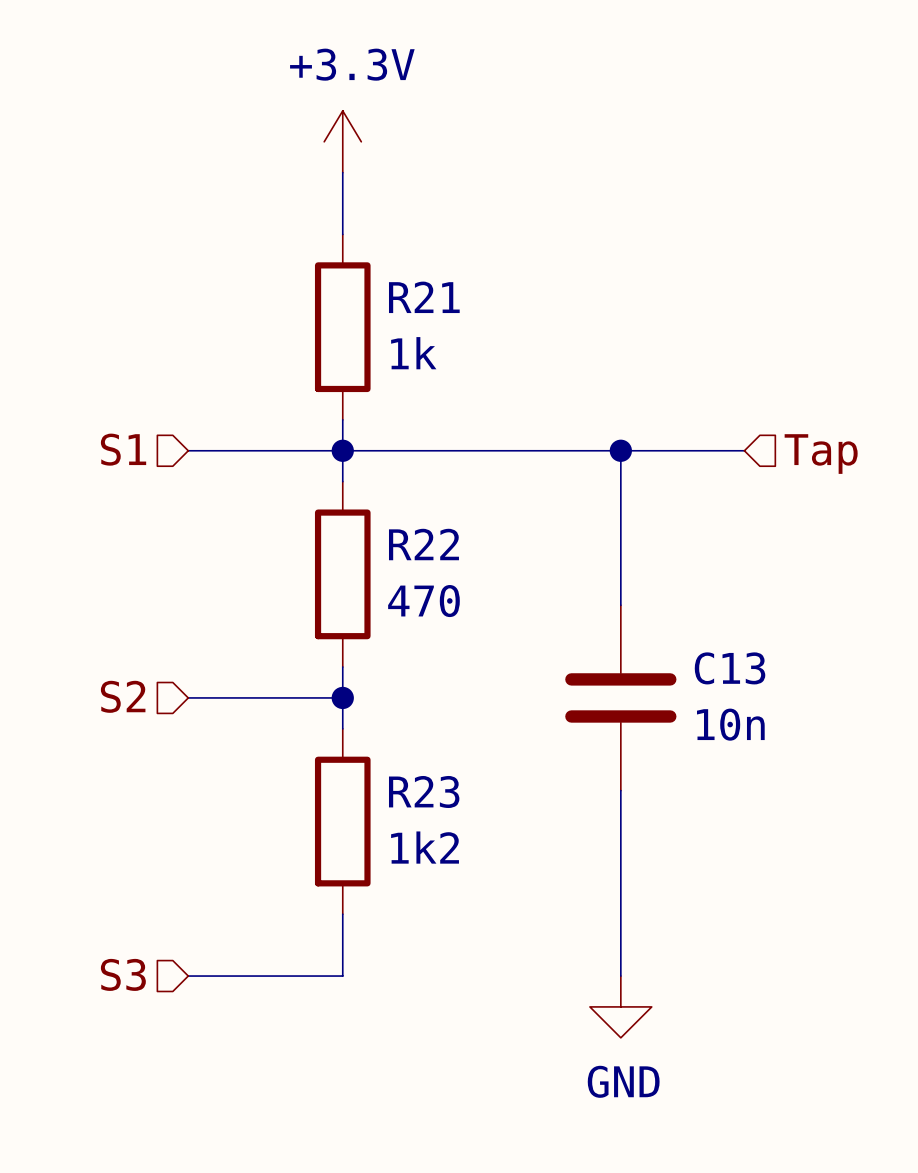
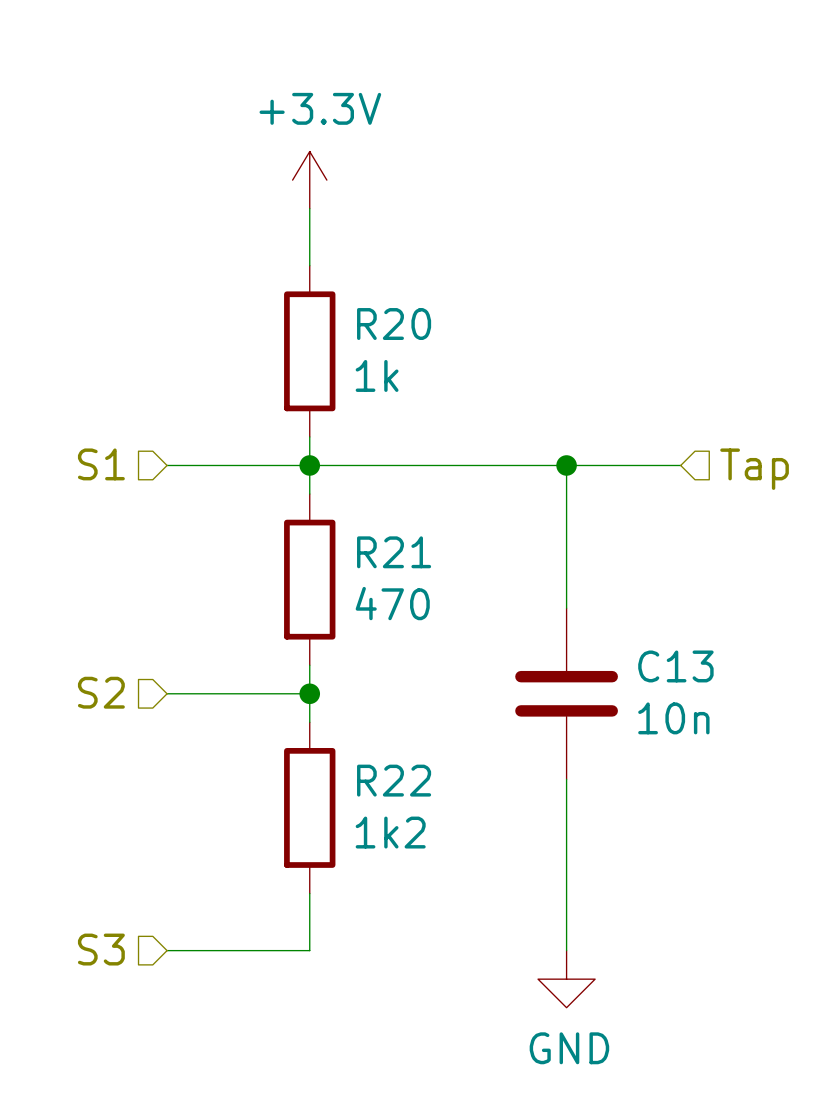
R21 name: R21 (424, 297) -> R20 (394, 324)
R22 name: R22 (423, 544) -> R21 (394, 552)
R23 name: R23 (424, 791) -> R22 (394, 780)

